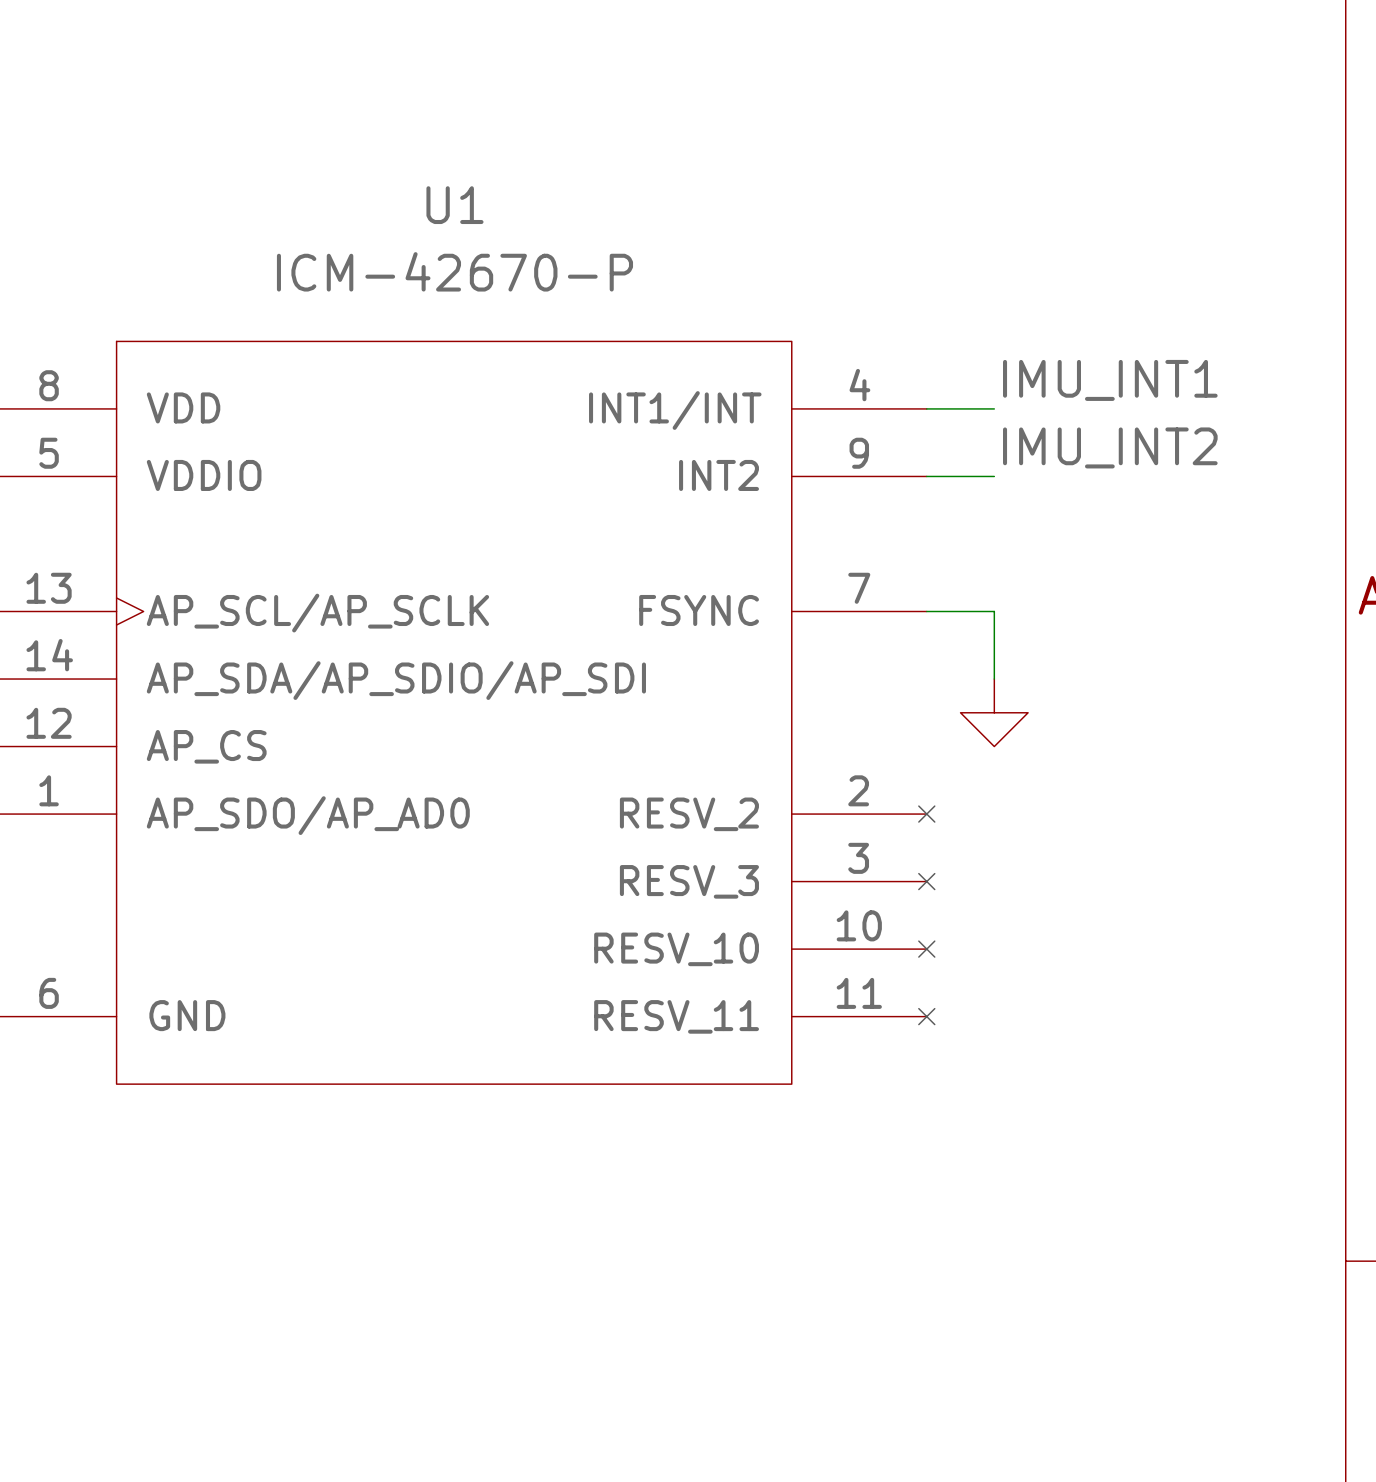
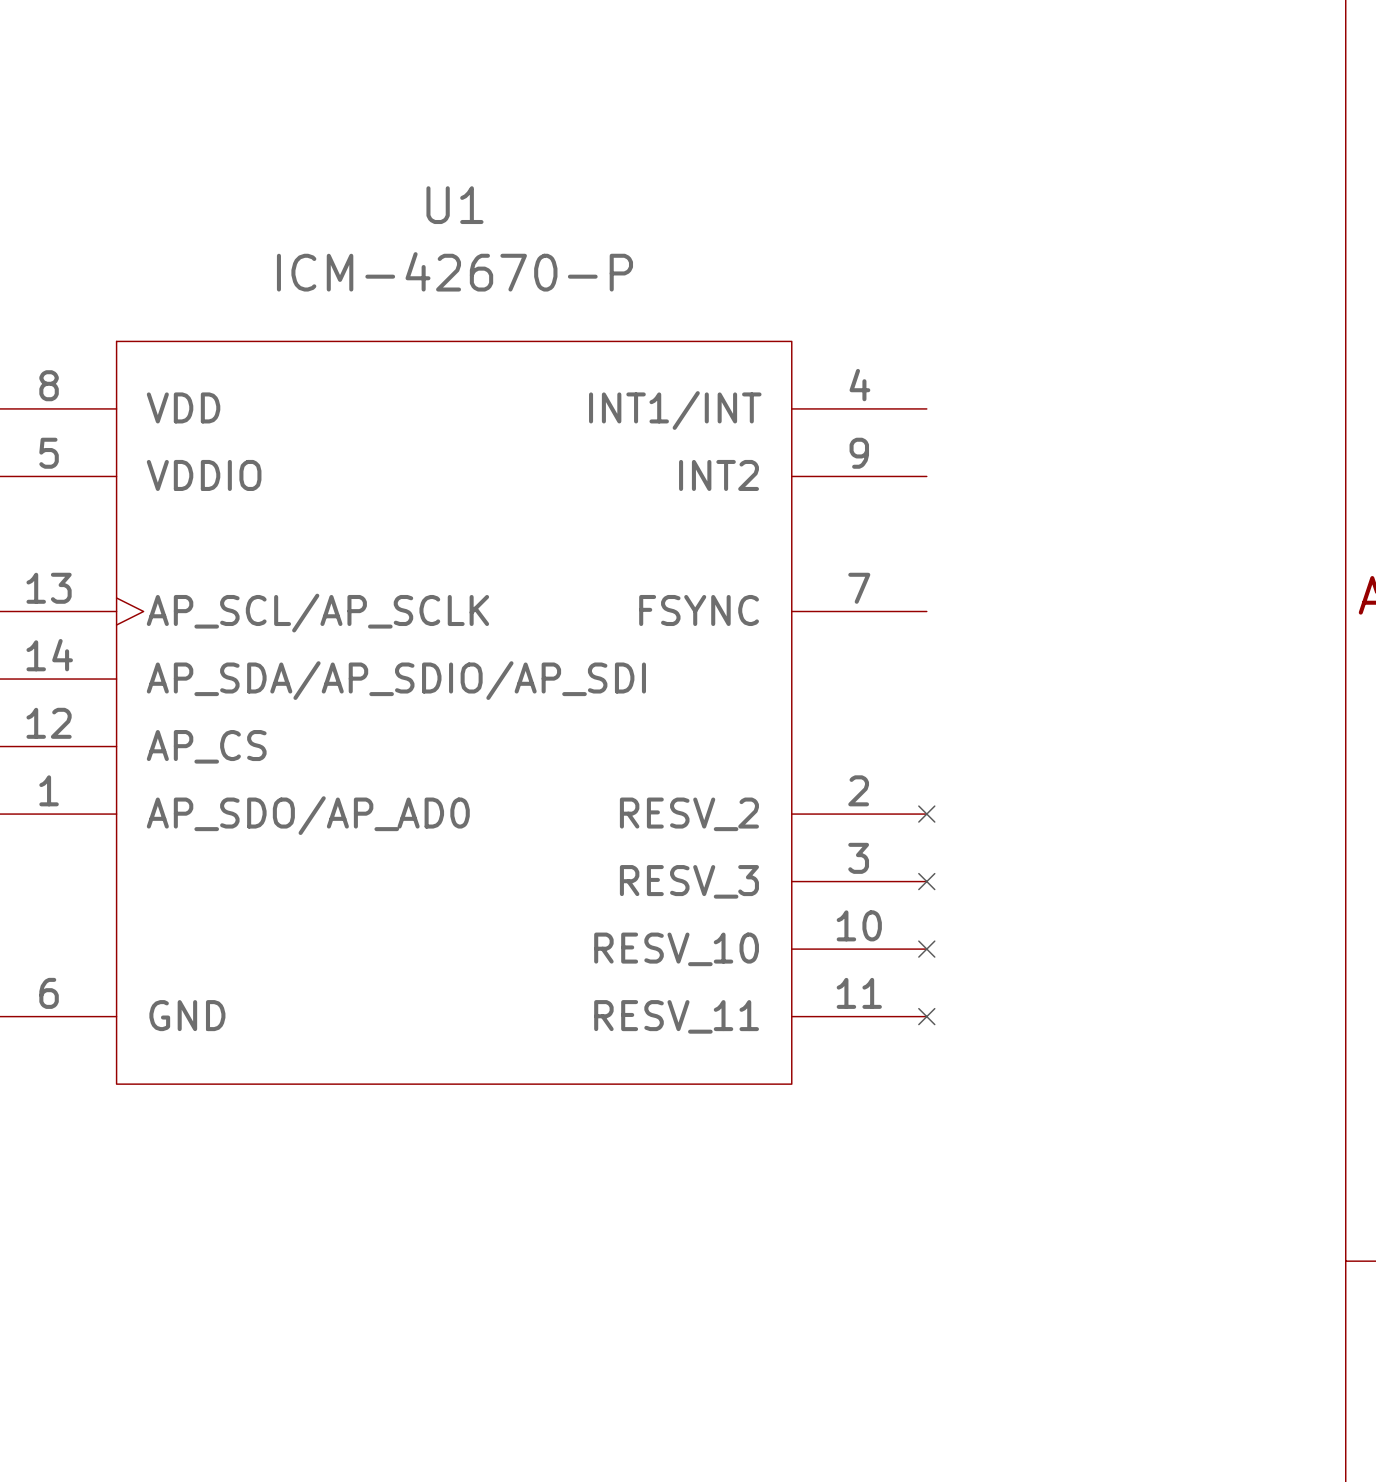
label: IMU_INT1 (1110, 380) -> none
wire: (926, 408) (994, 408) -> none
label: IMU_INT2 (1110, 447) -> none
wire: (926, 476) (994, 476) -> none
wire: (926, 611) (994, 611) (994, 679) -> none
power symbol: (994, 712) -> none

